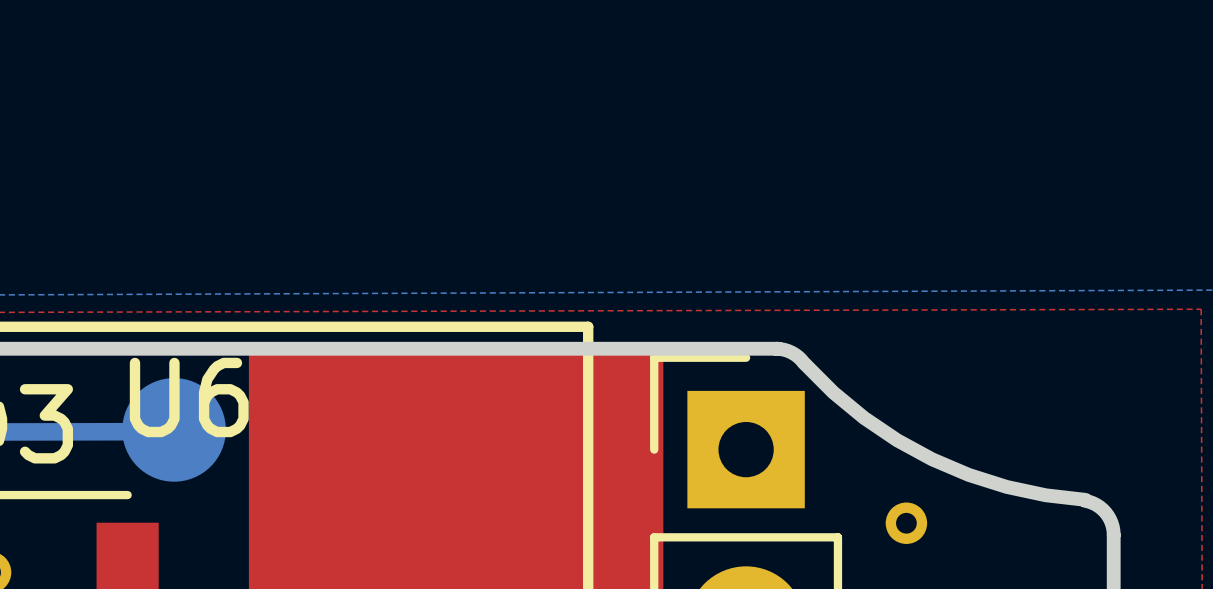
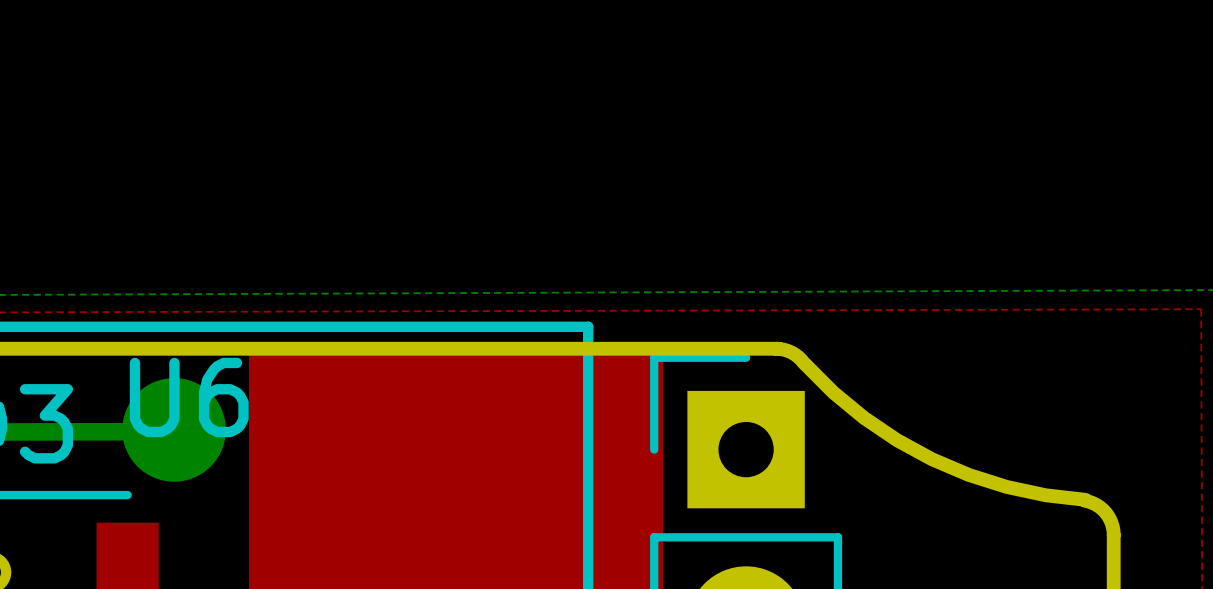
part: (906, 523) -> none

